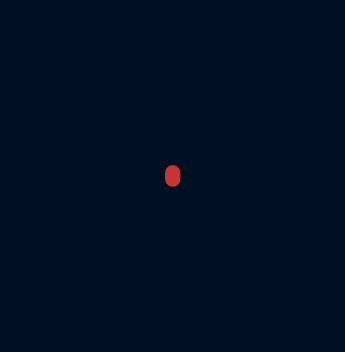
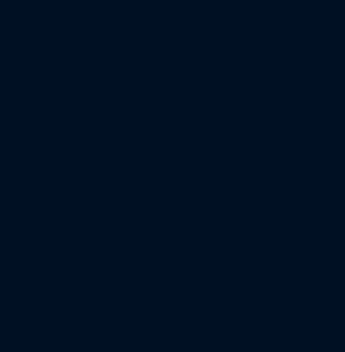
top track: (172, 172) (172, 179) -> none

